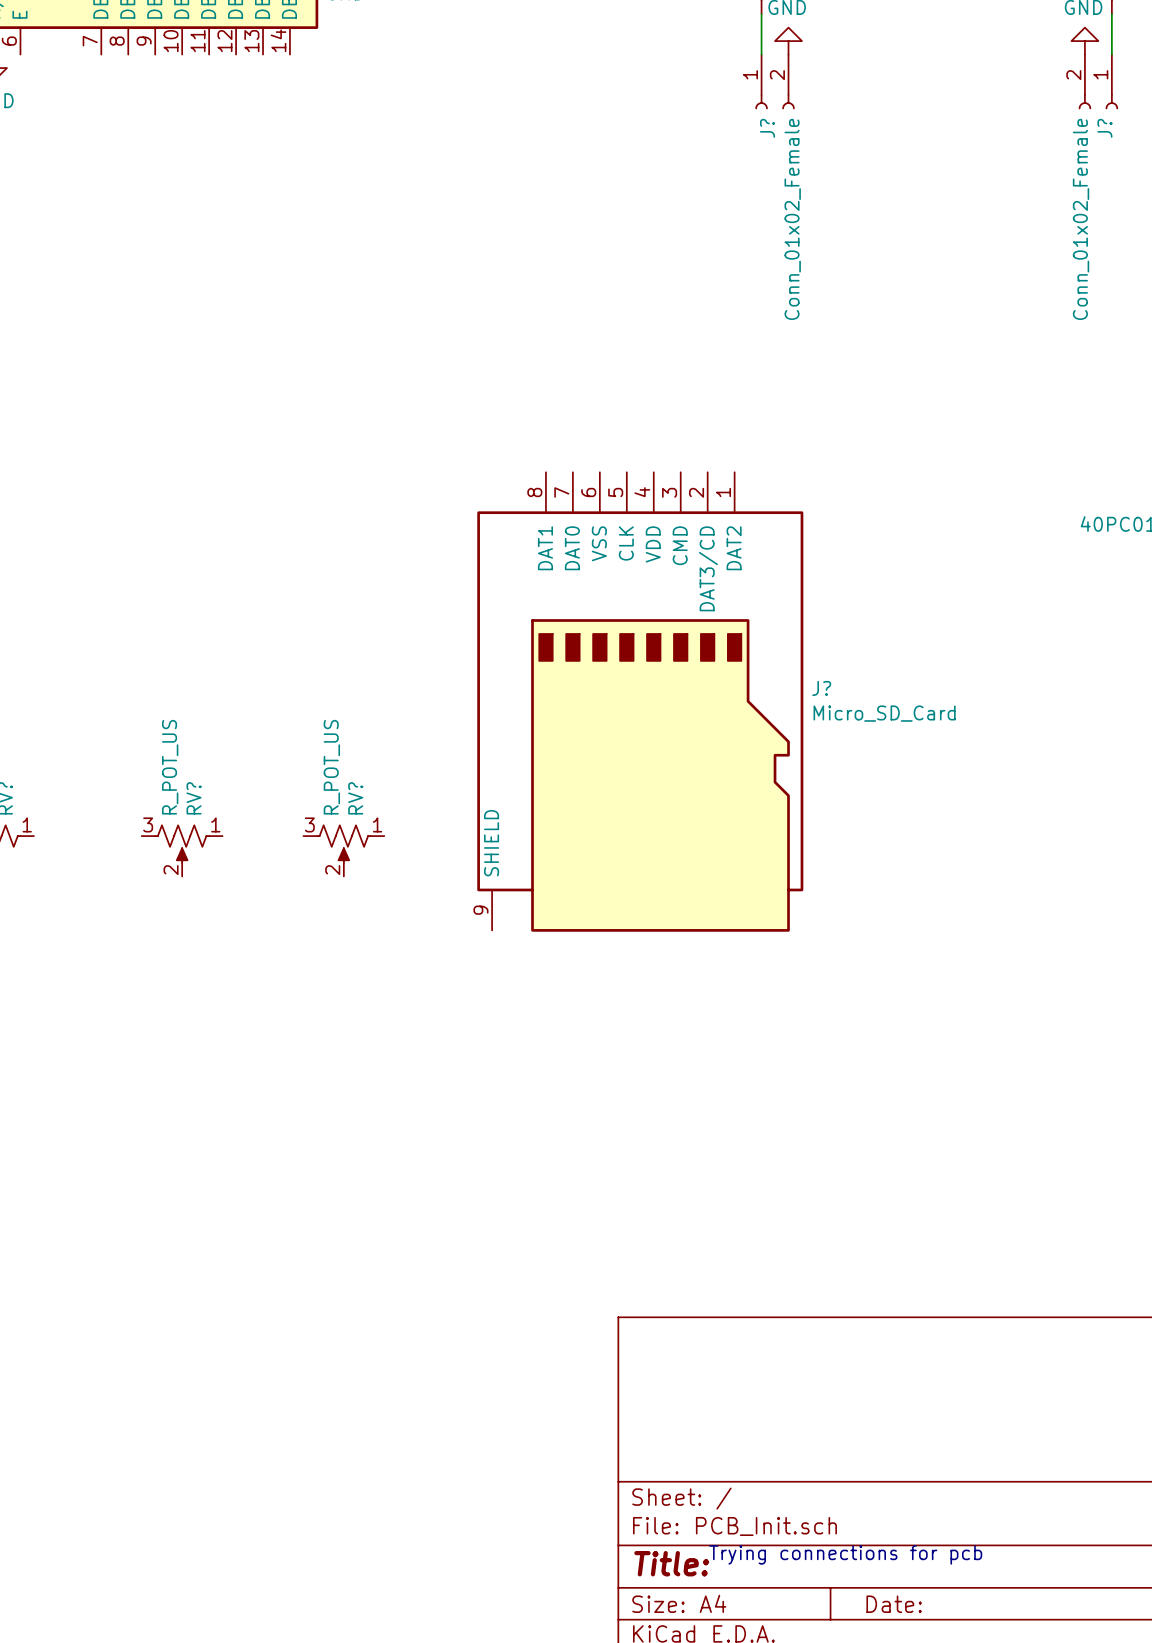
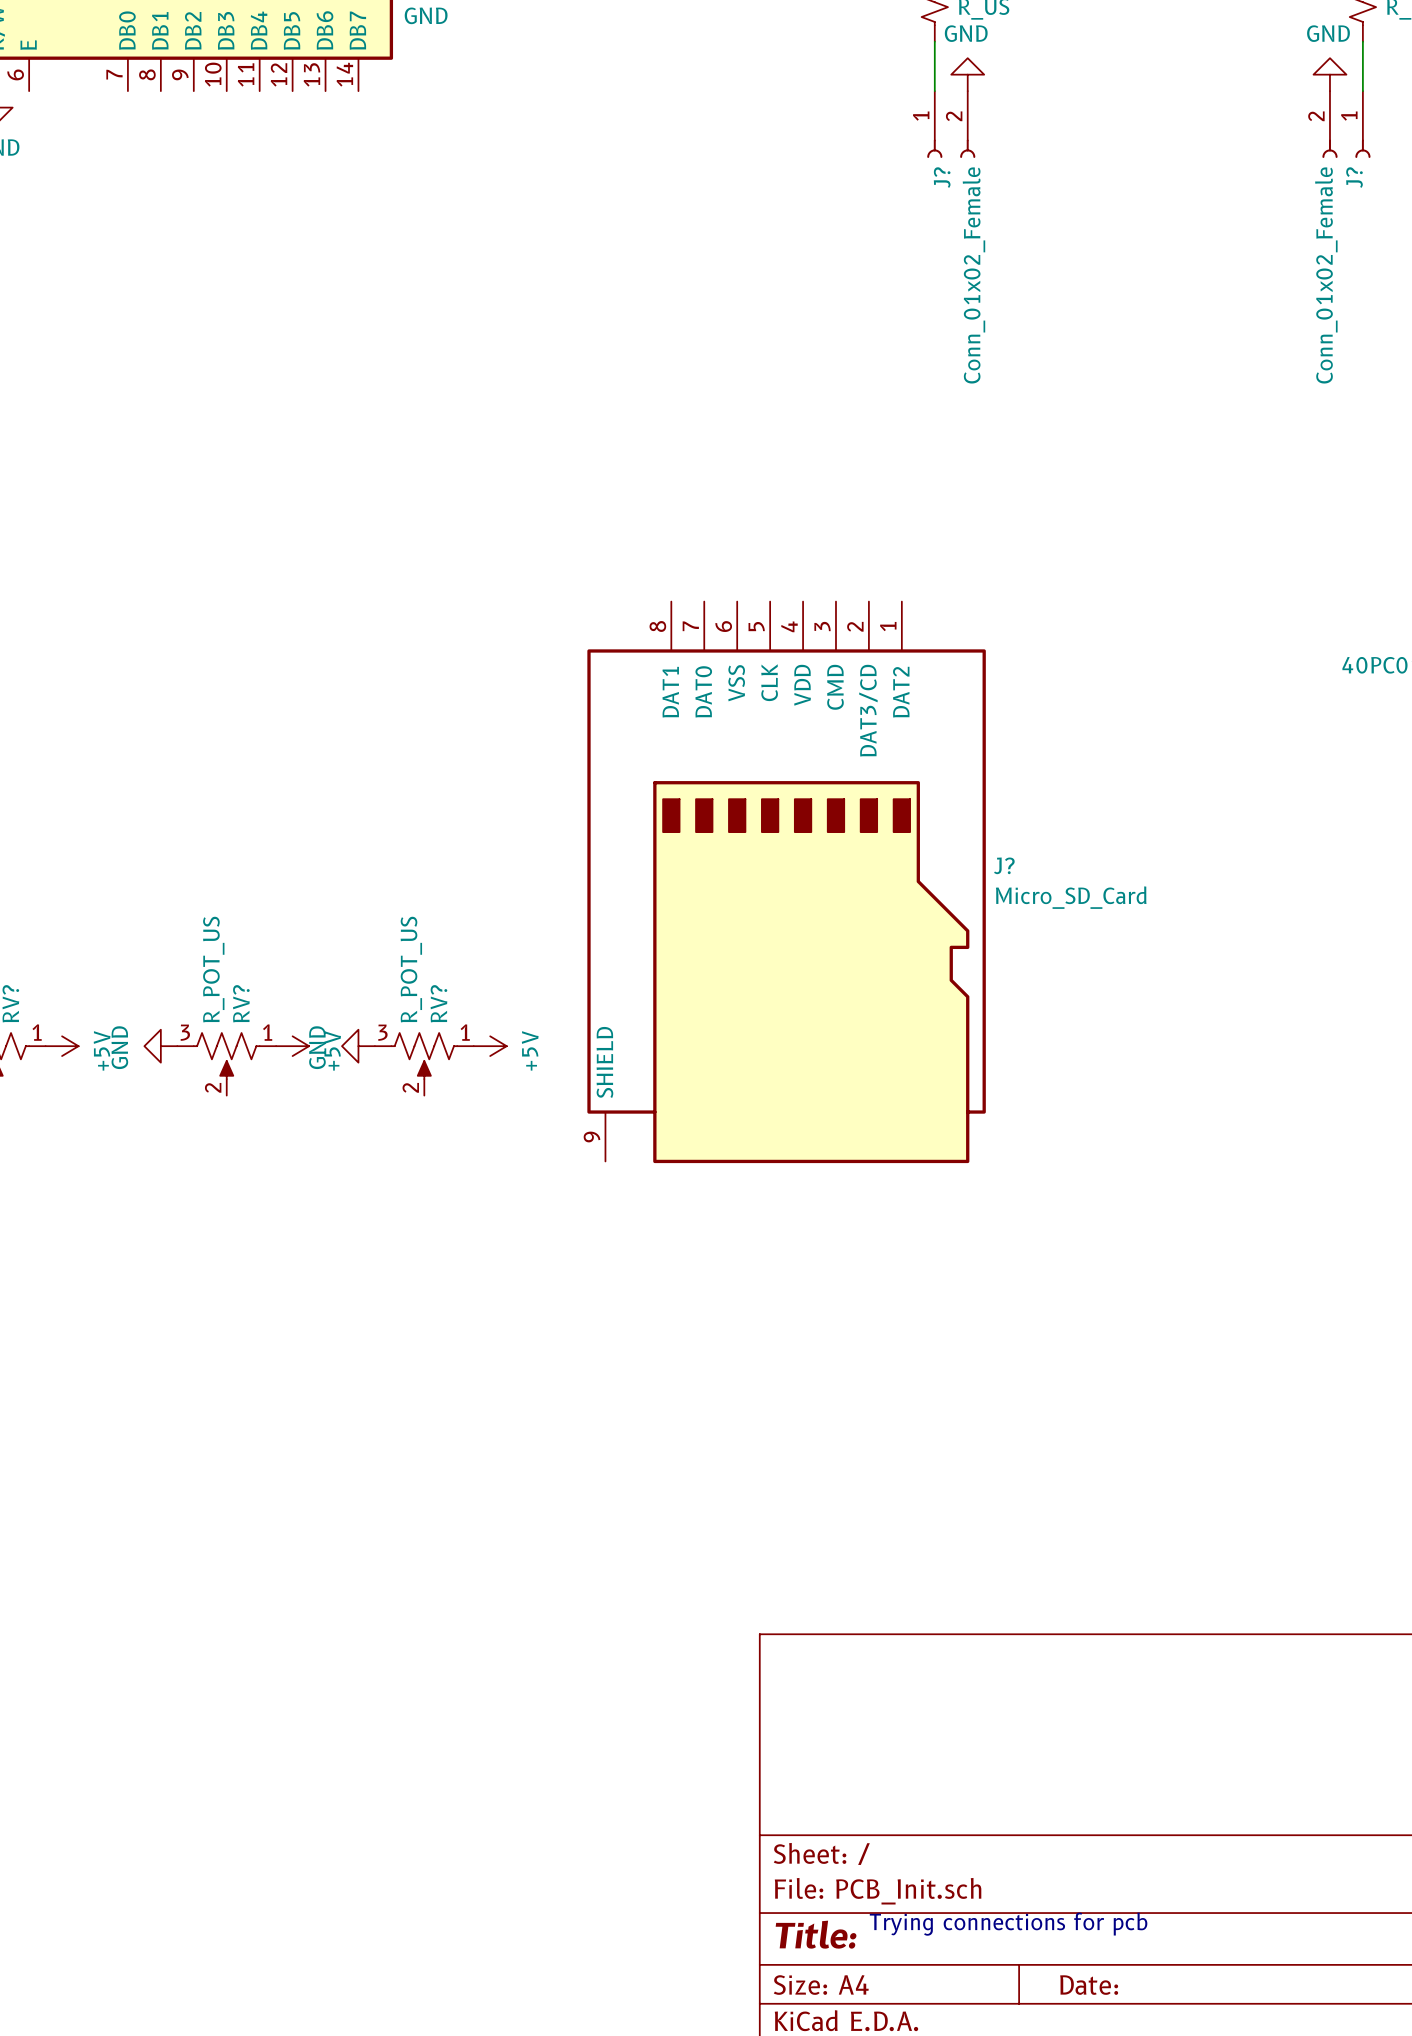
power symbol: none -> +5V (62, 1046)
power symbol: none -> GND (160, 1046)
power symbol: none -> +5V (292, 1046)
power symbol: none -> GND (358, 1046)
power symbol: none -> +5V (490, 1046)

